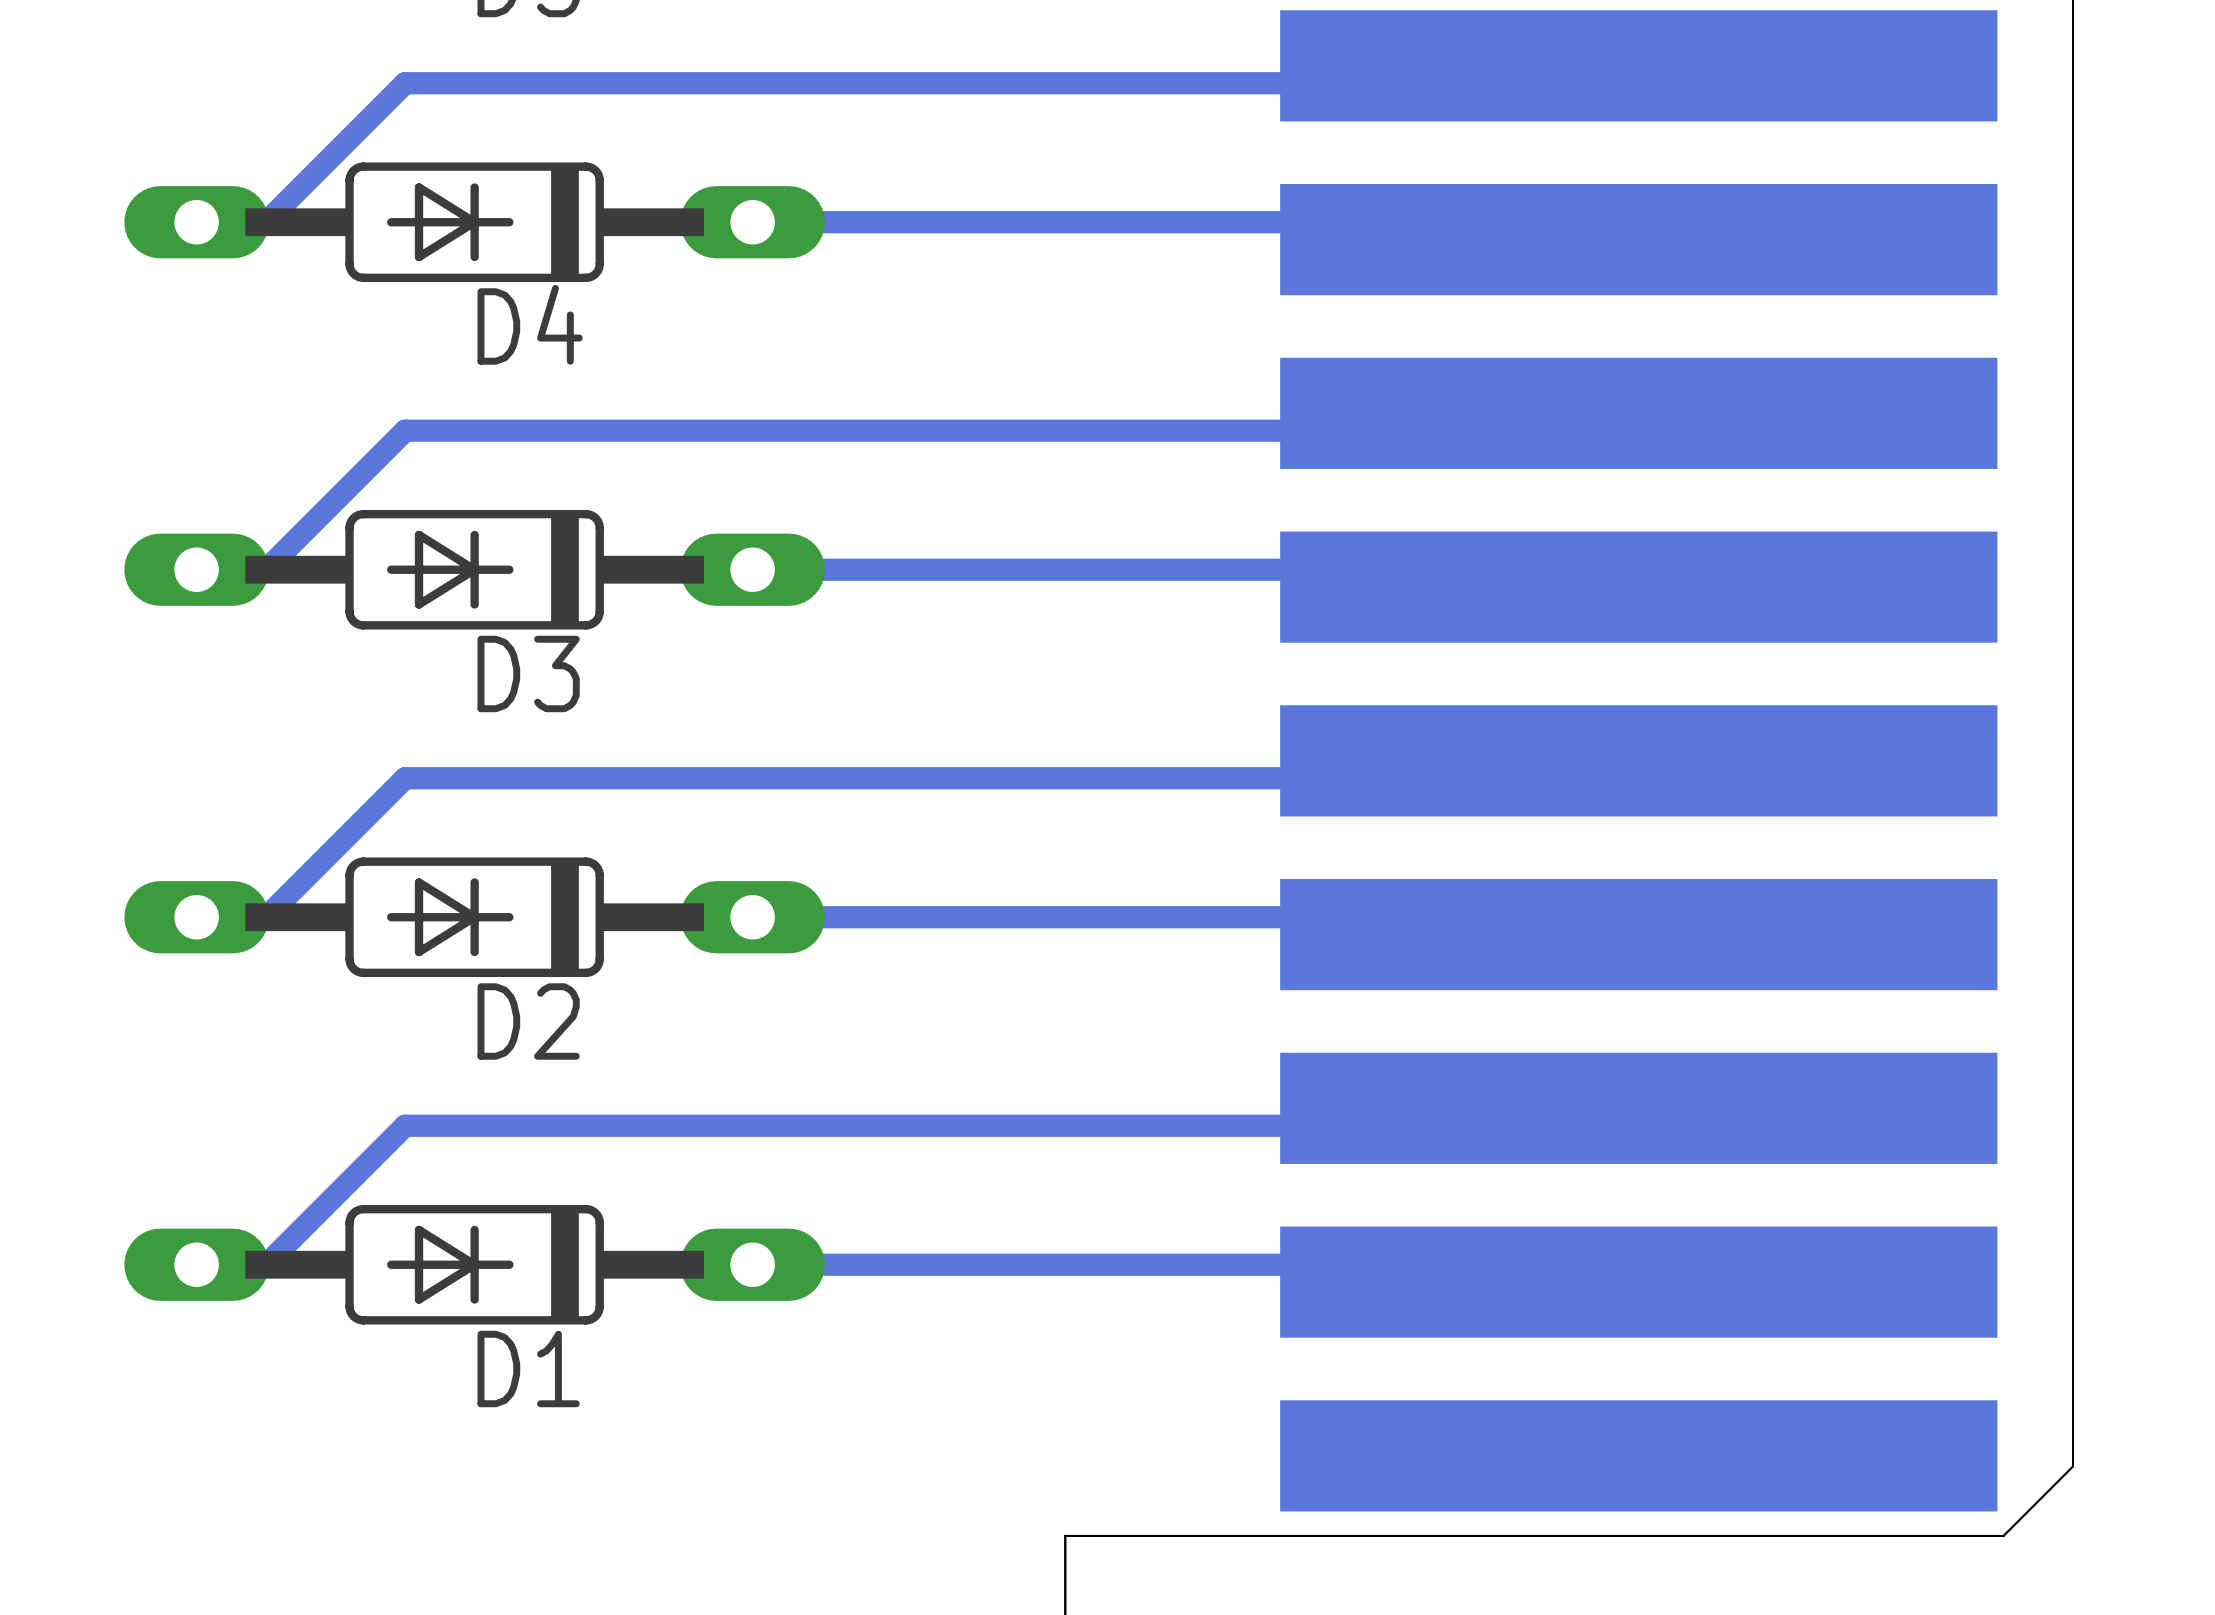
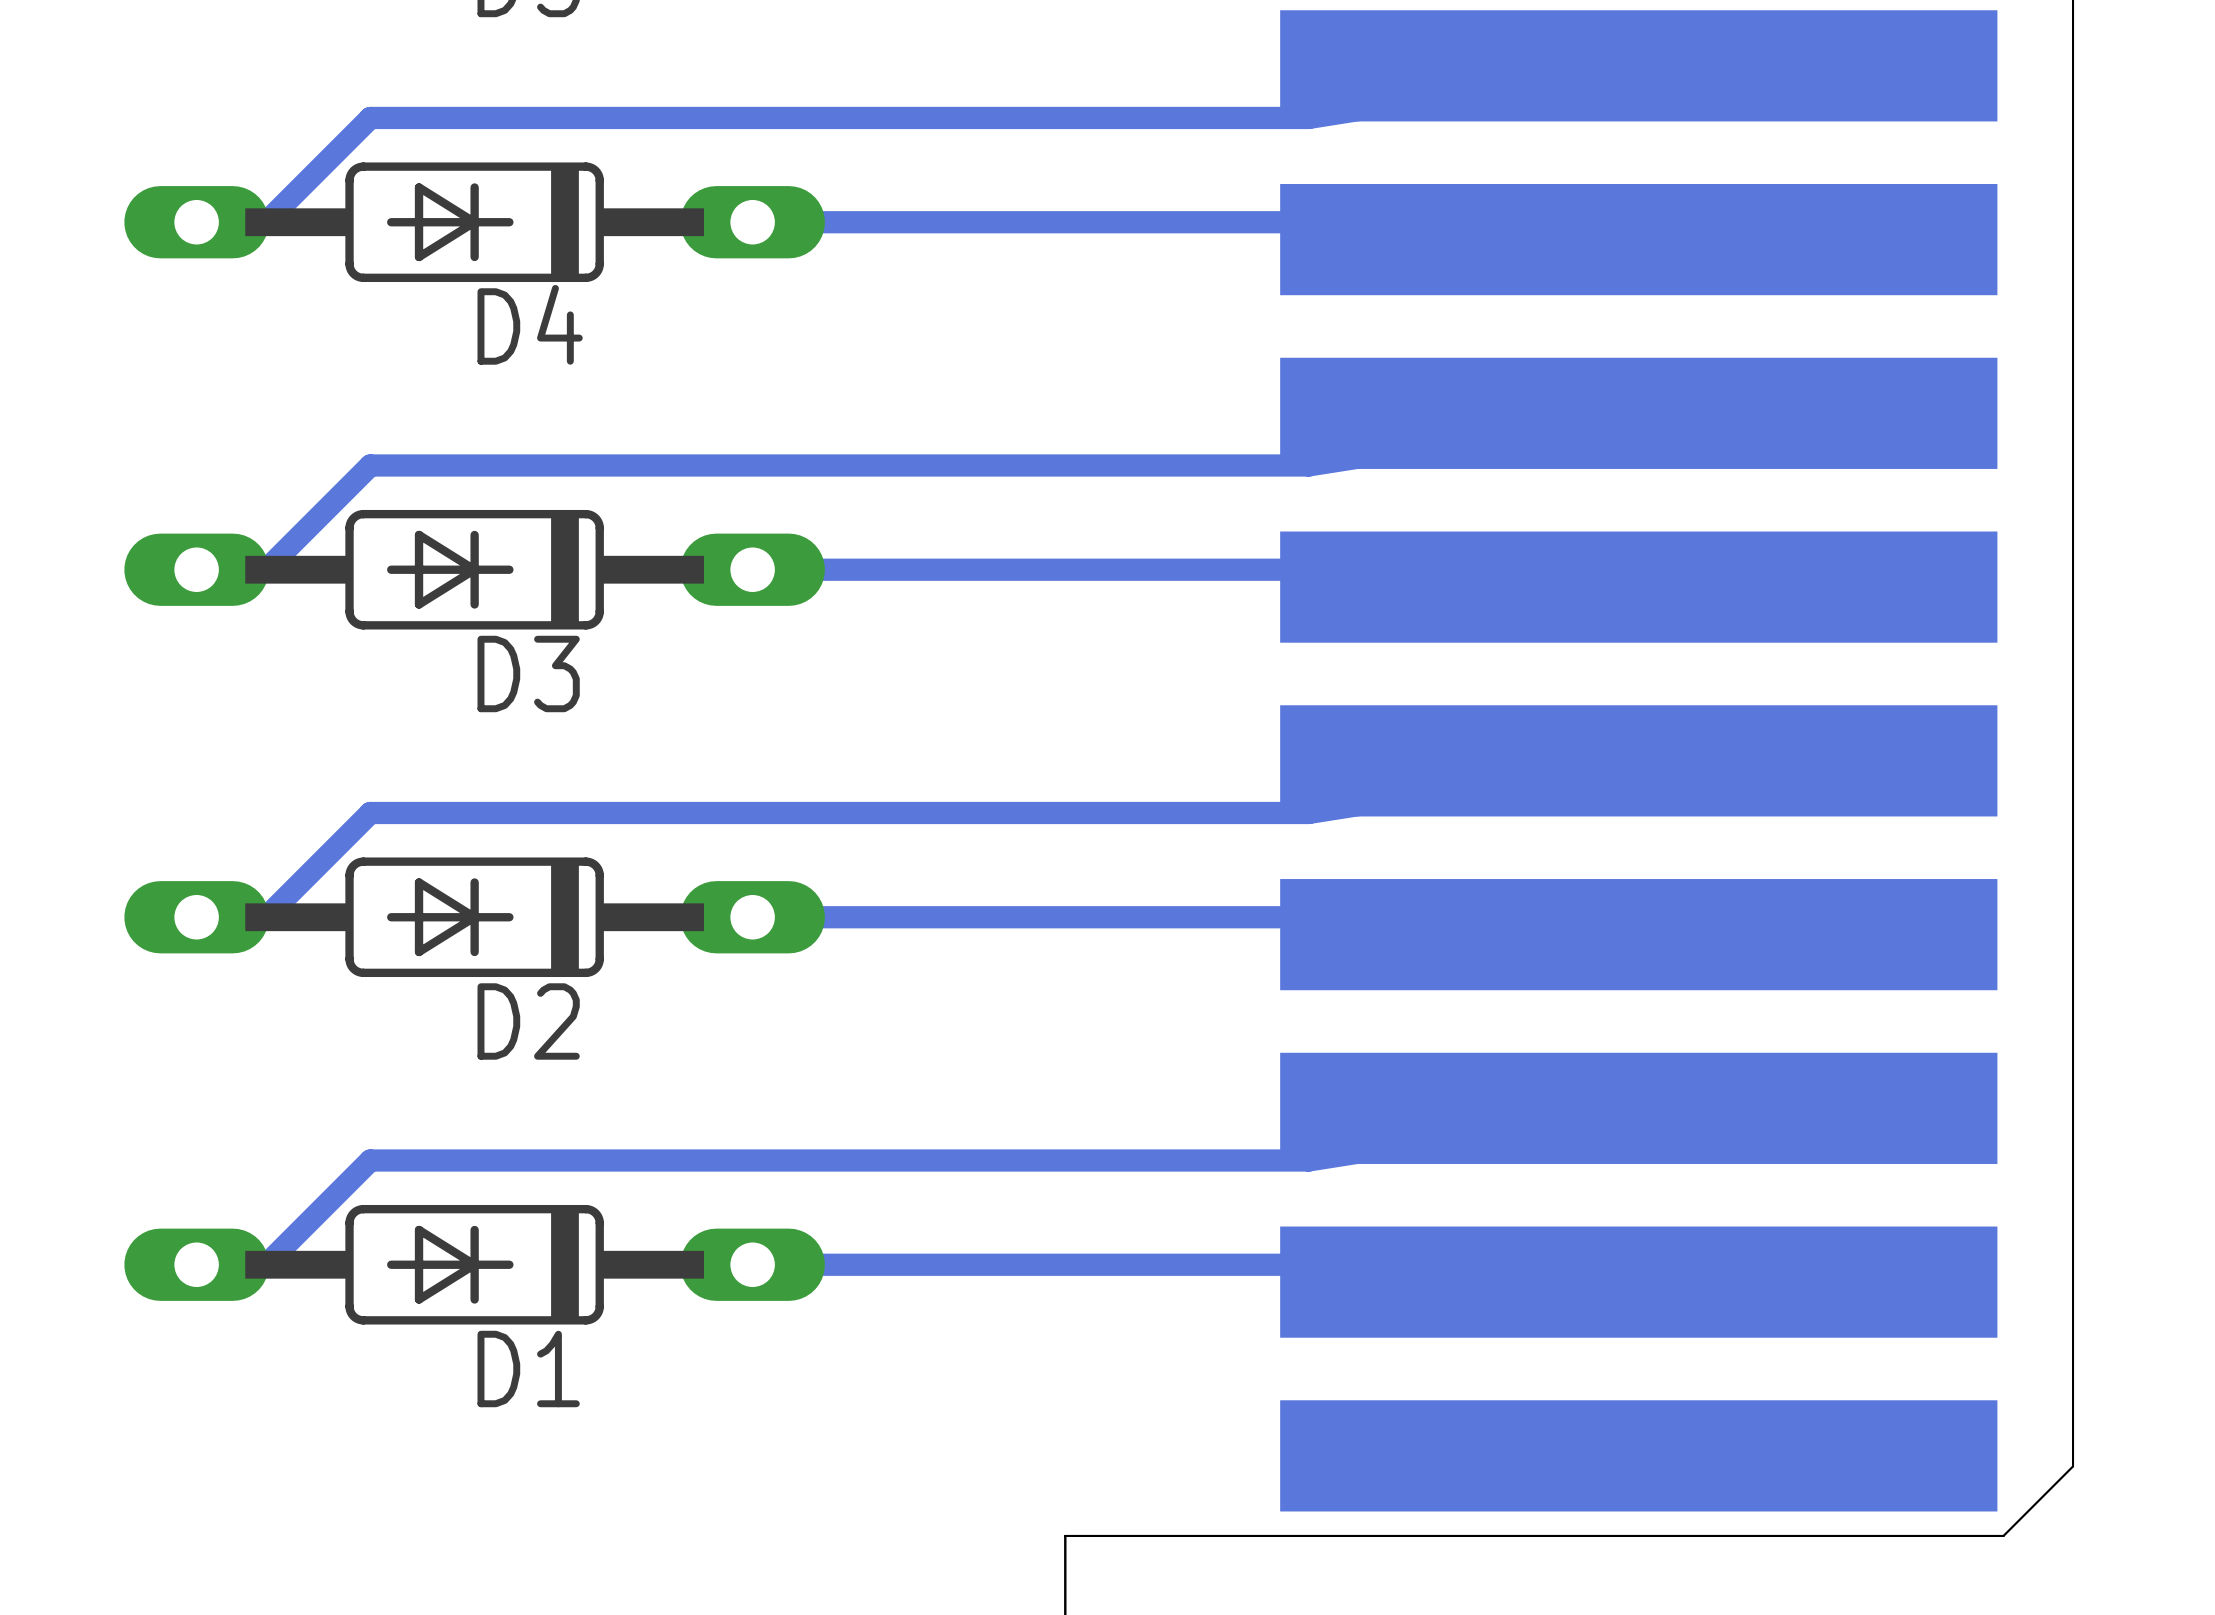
bottom track: (1638, 65) (1343, 83) (405, 83) (370, 117) -> (1638, 65) (1308, 117) (370, 117)
bottom track: (1638, 413) (1343, 430) (405, 430) (370, 465) -> (1638, 413) (1308, 465) (370, 465)
bottom track: (1638, 760) (1343, 778) (405, 778) (370, 812) -> (1638, 760) (1308, 812) (370, 812)
bottom track: (1638, 1108) (1343, 1125) (405, 1125) (370, 1160) -> (1638, 1108) (1308, 1160) (370, 1160)

